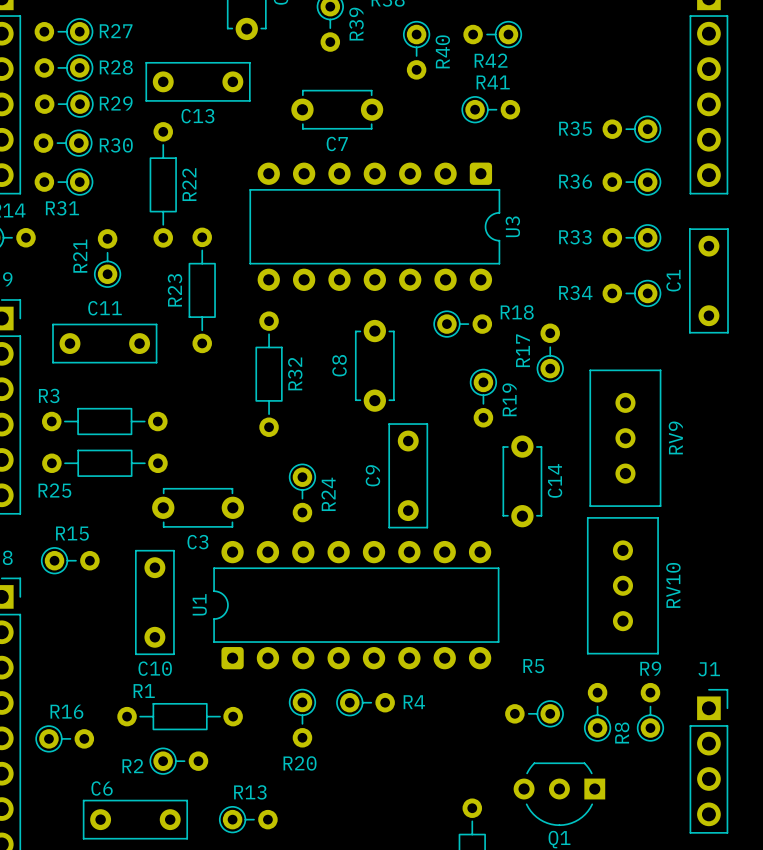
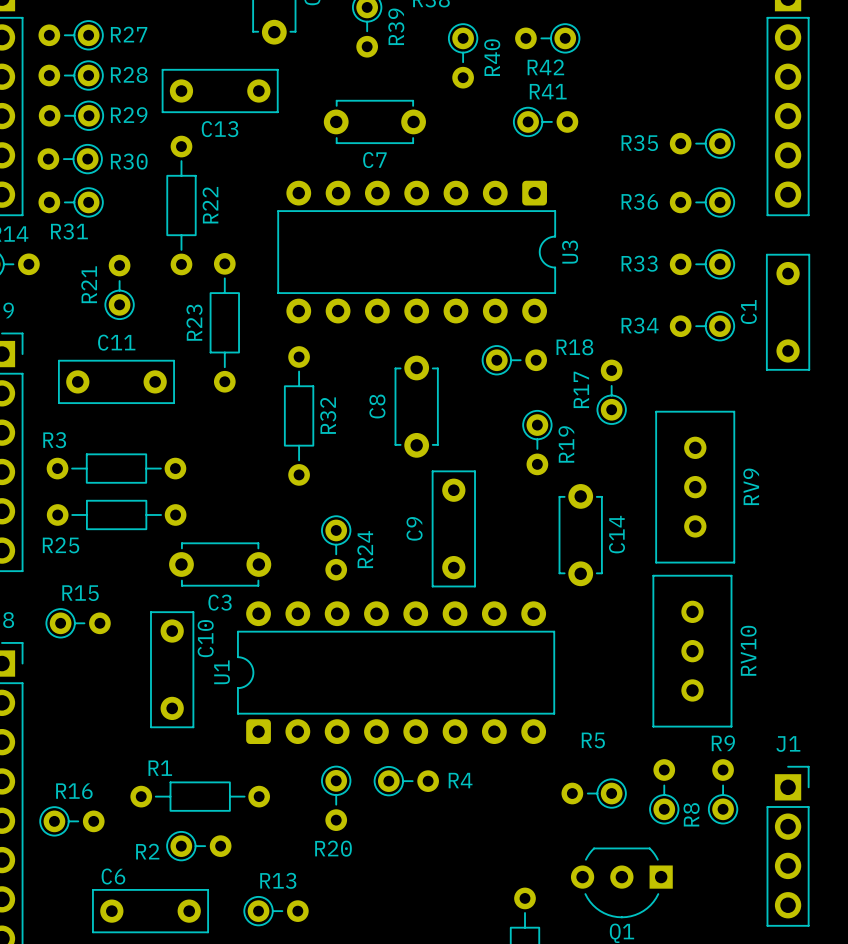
C10 name rotation: 0° (155, 668) -> 90° counterclockwise (205, 638)
C10 name position: C10 (155, 668) -> C10 (205, 638)

